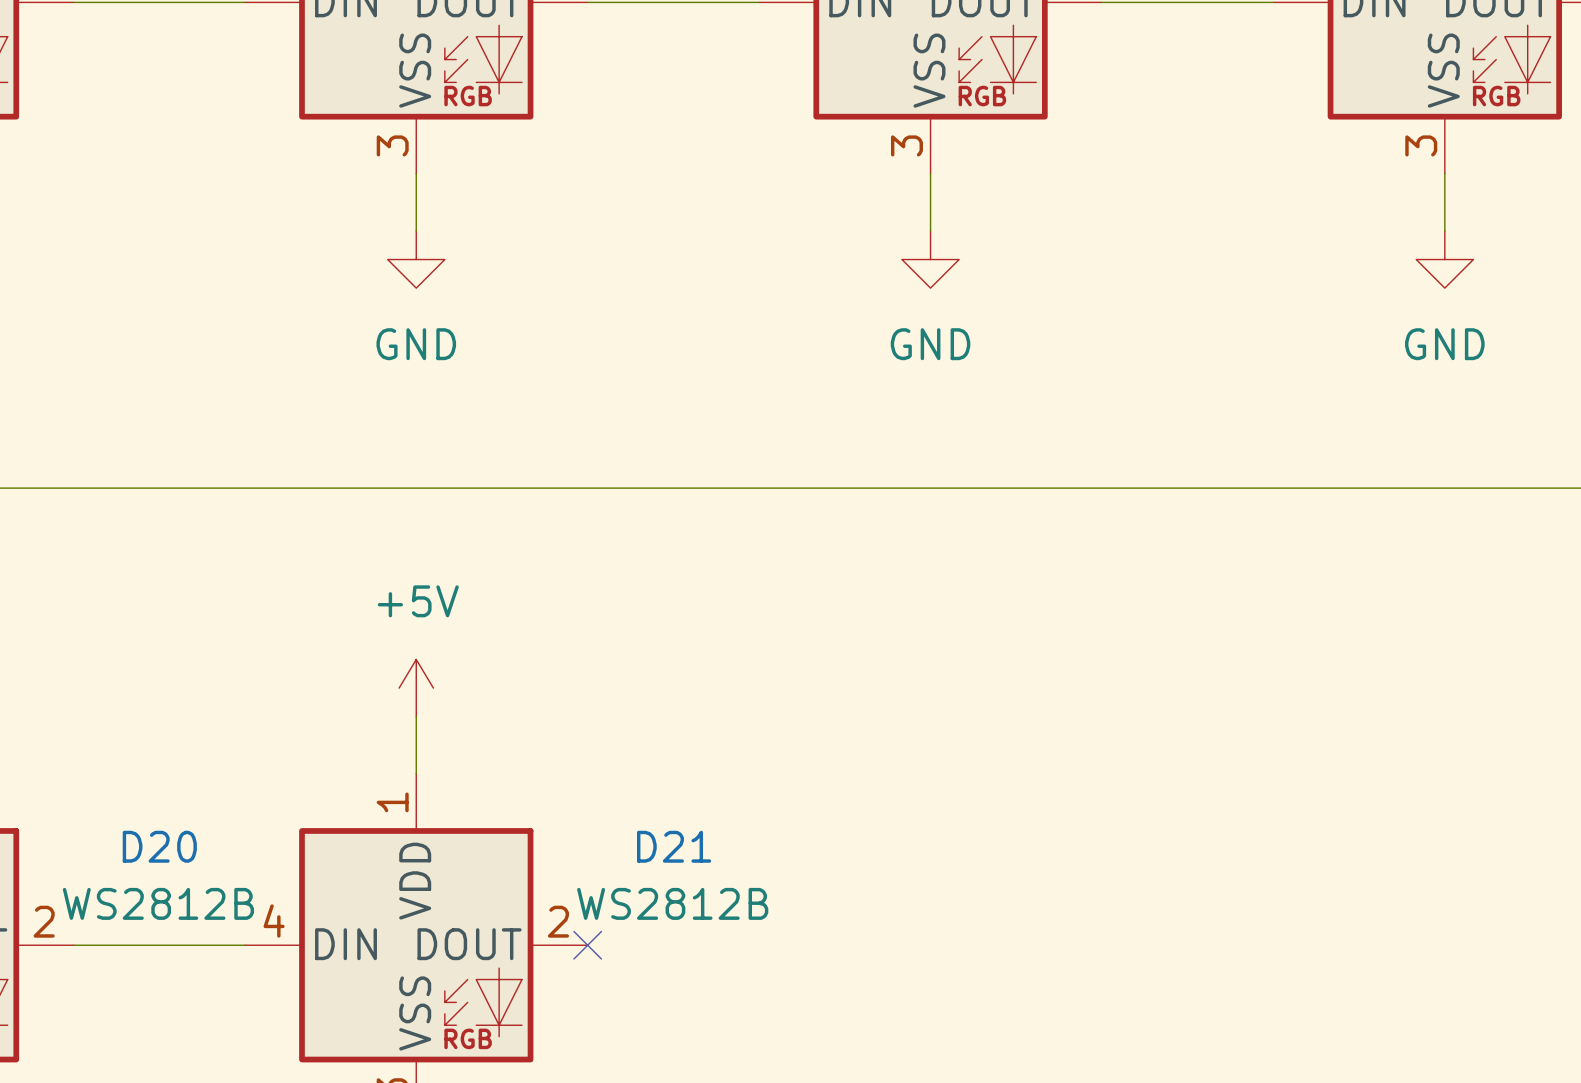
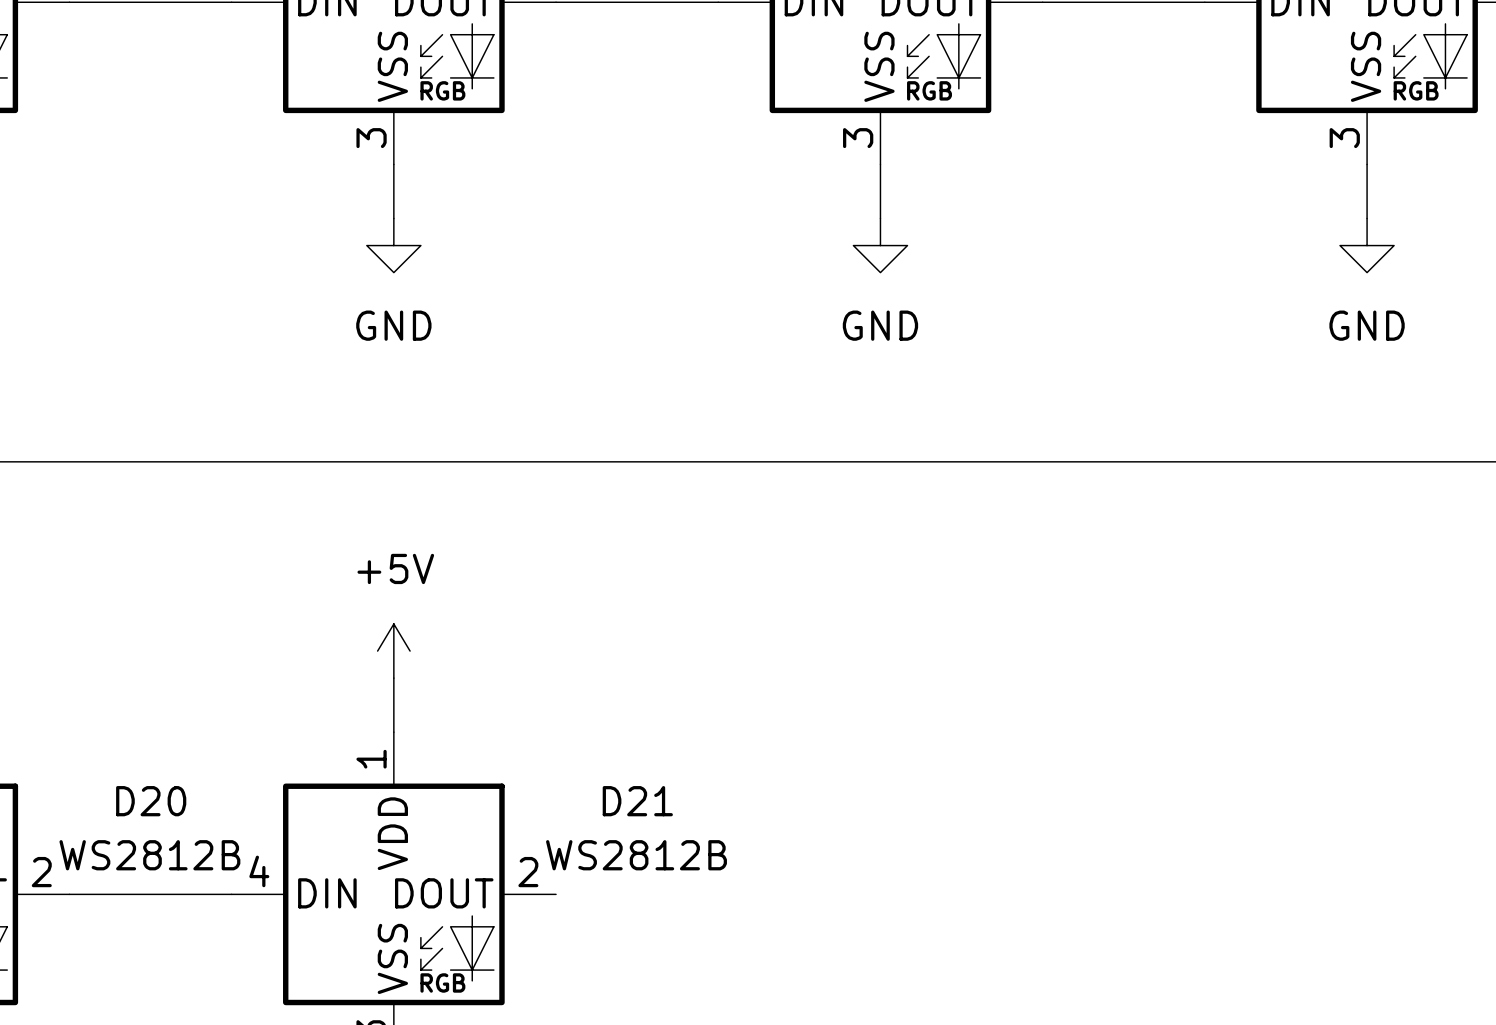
no-connect mark: (587, 945) -> none

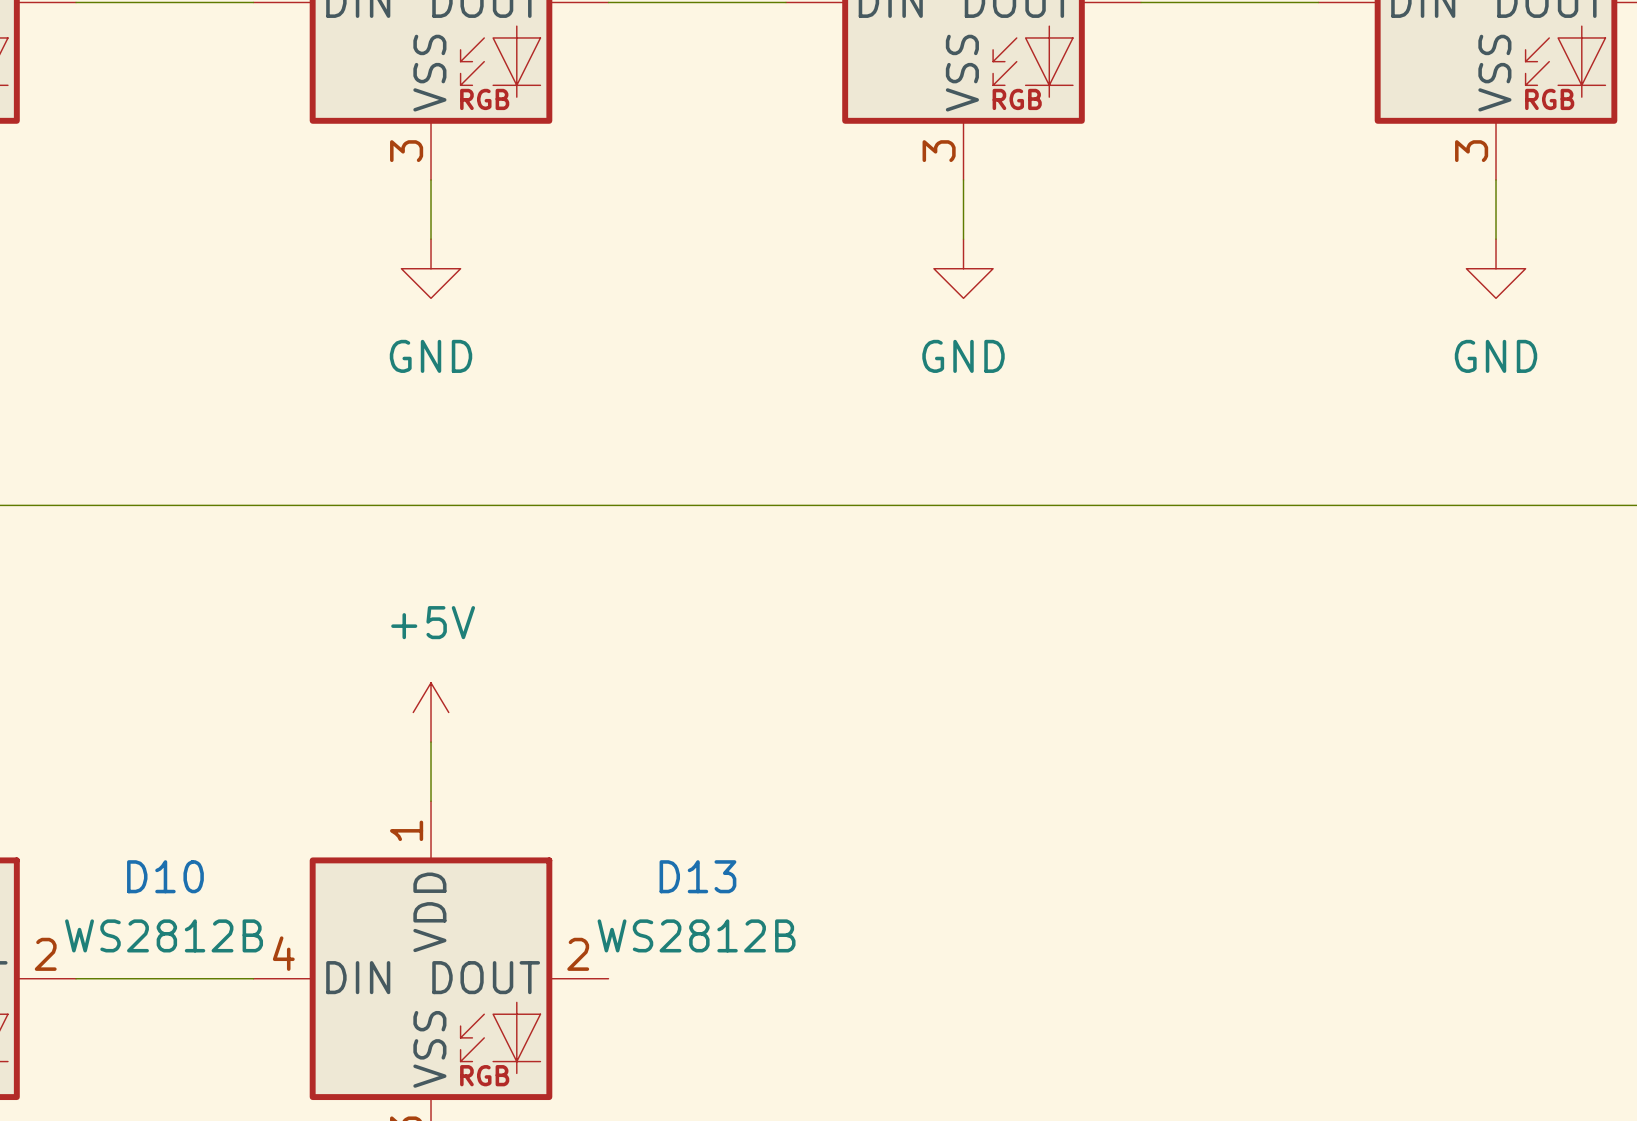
D20 name: D20 (151, 801) -> D10 (165, 876)
D21 name: D21 (637, 801) -> D13 (697, 876)

